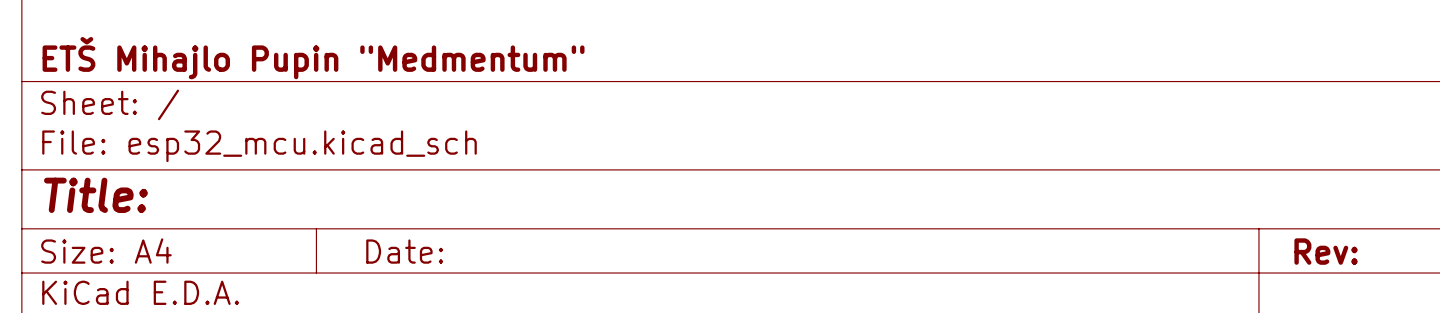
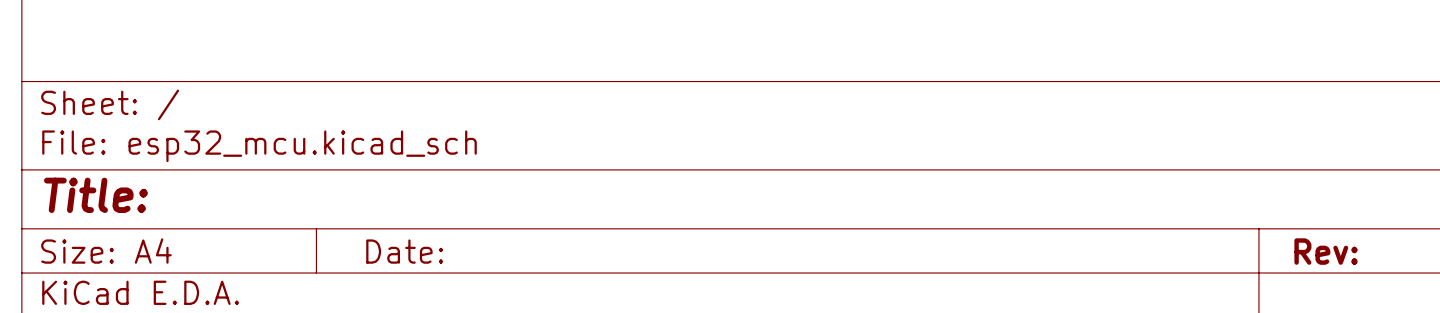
title block: ETŠ Mihajlo Pupin "Medmentum" (313, 58) -> none

